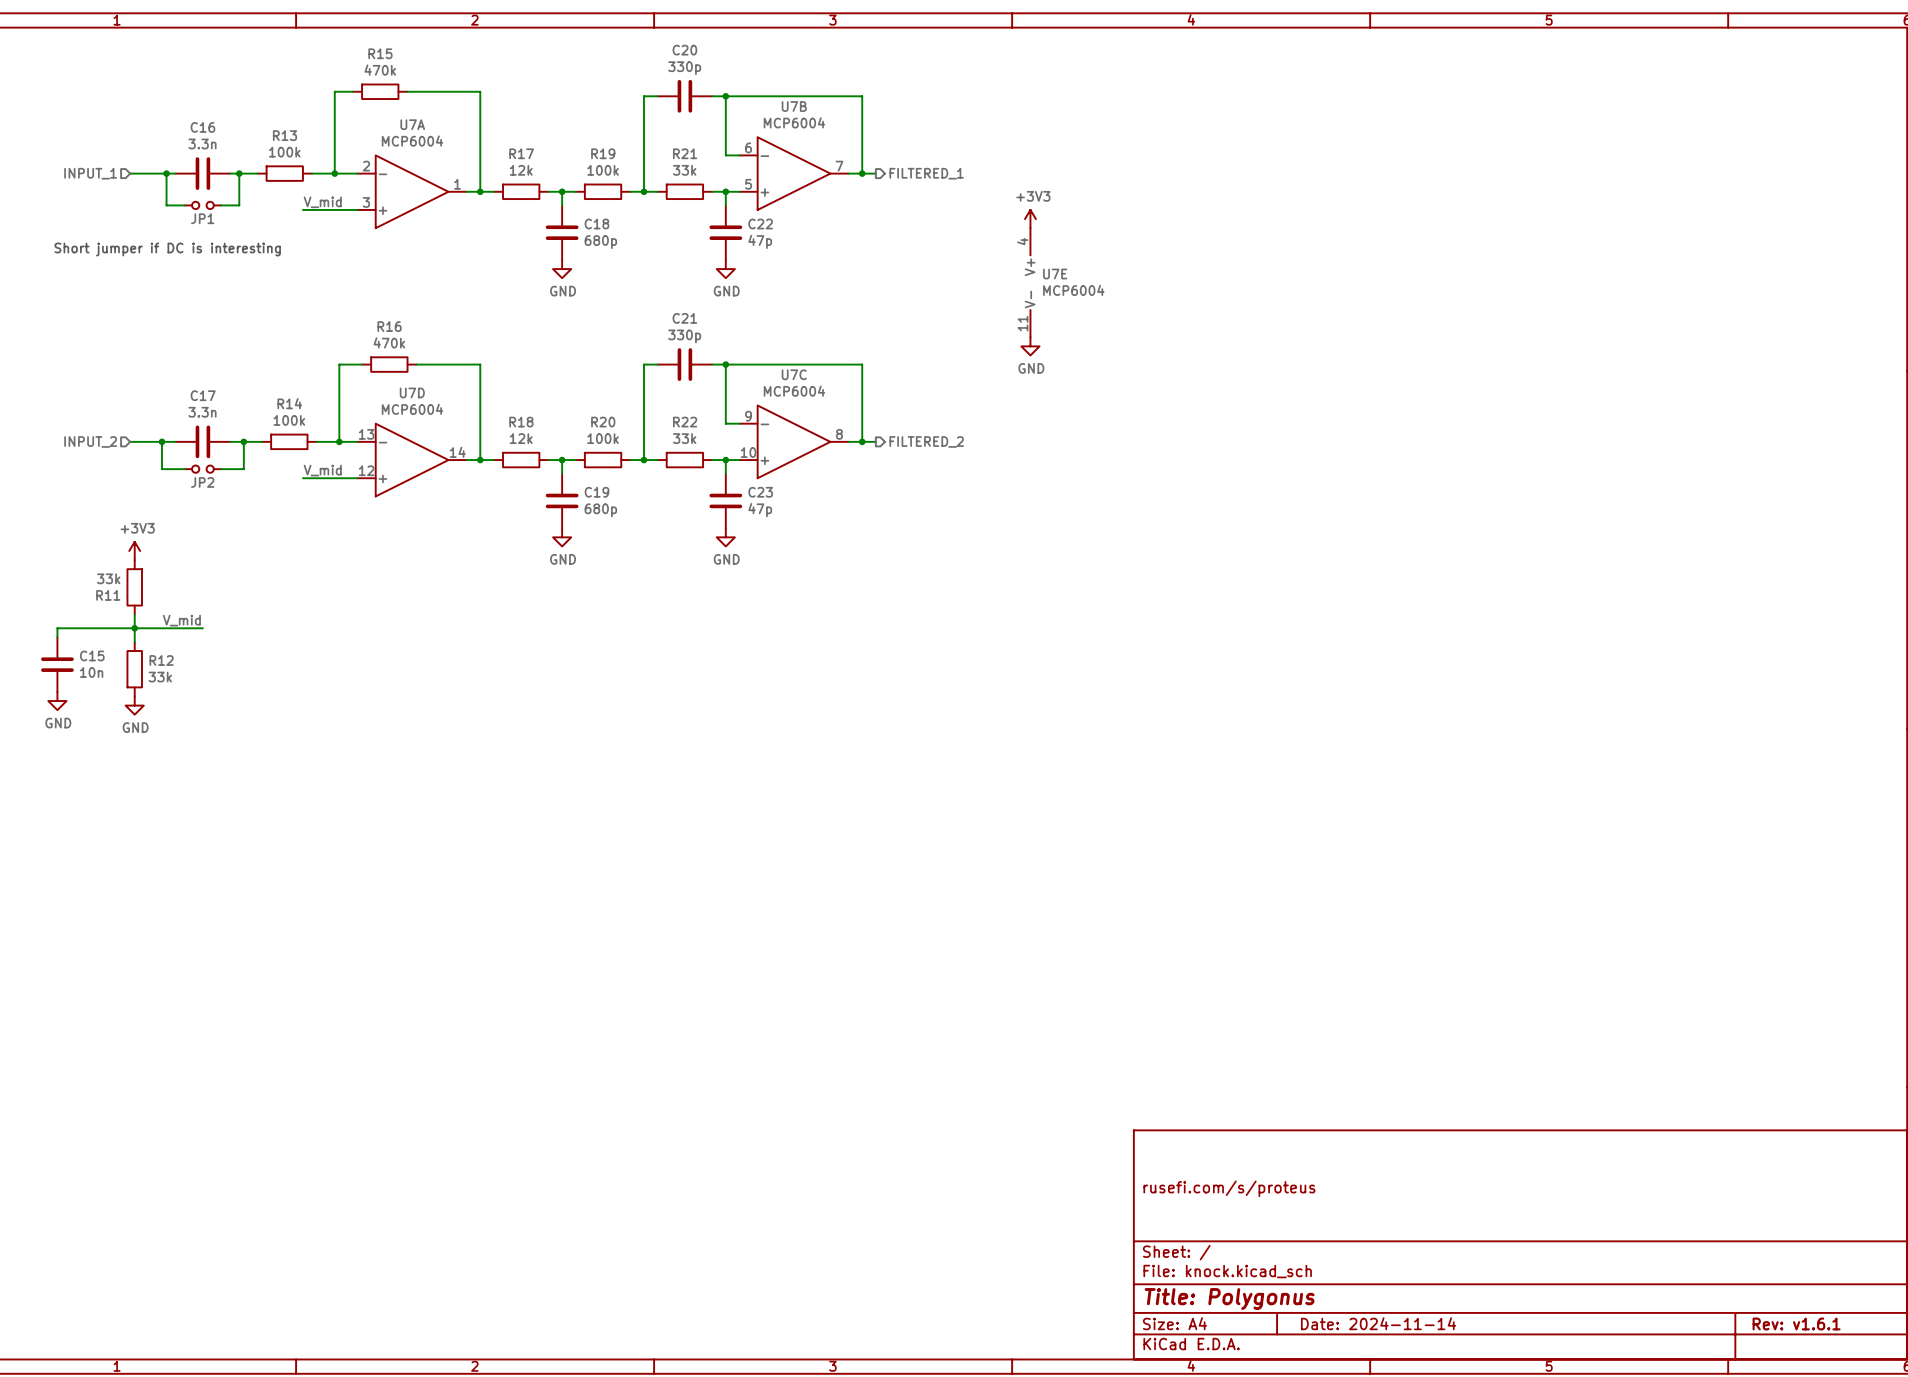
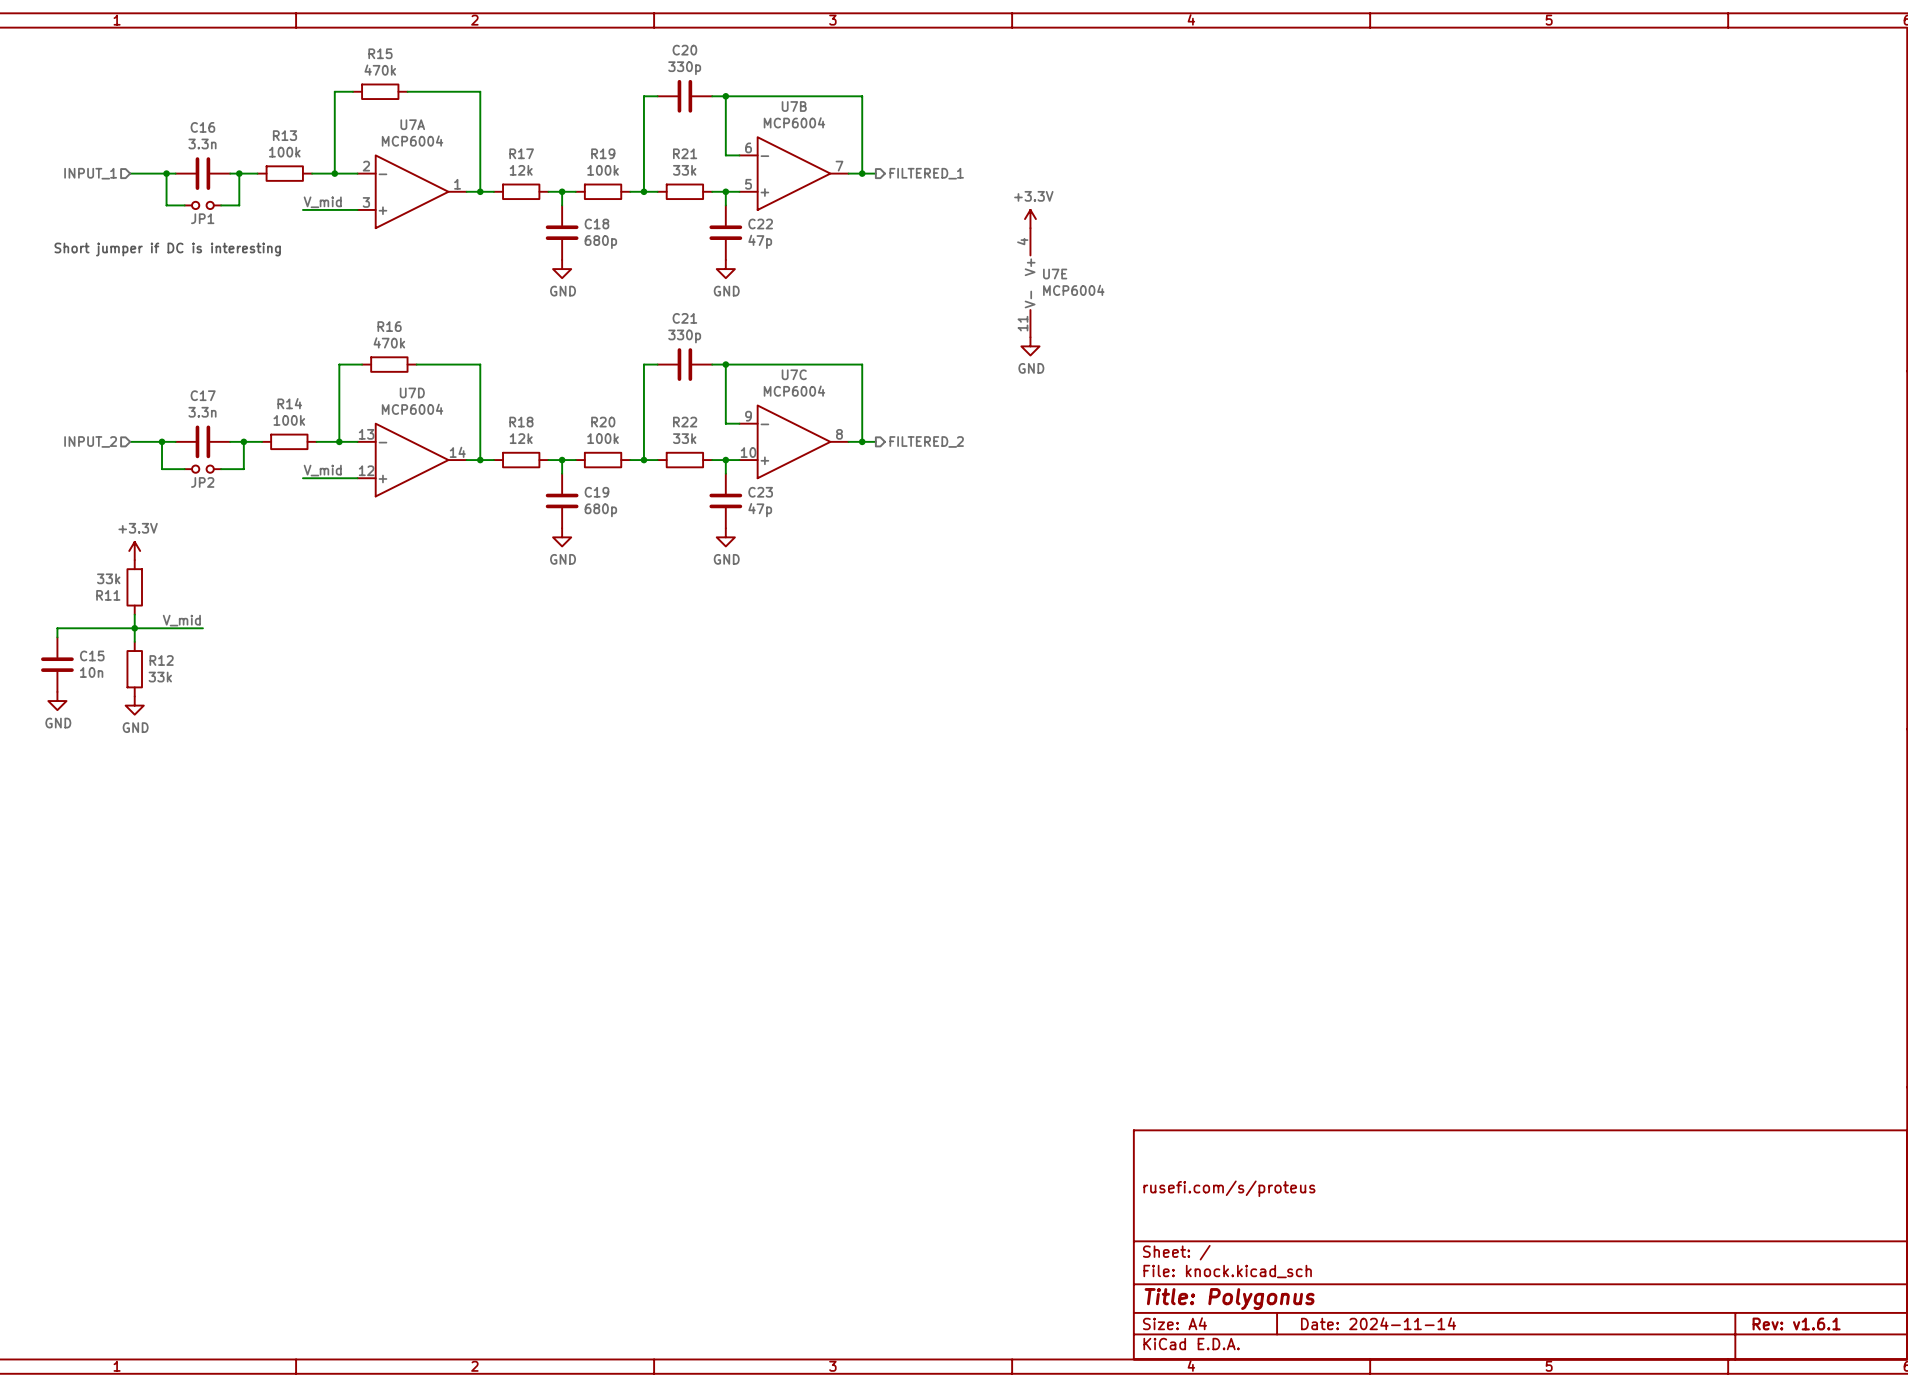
power symbol: +3V3 (1030, 219) -> +3.3V (1030, 219)
power symbol: +3V3 (134, 550) -> +3.3V (134, 550)

